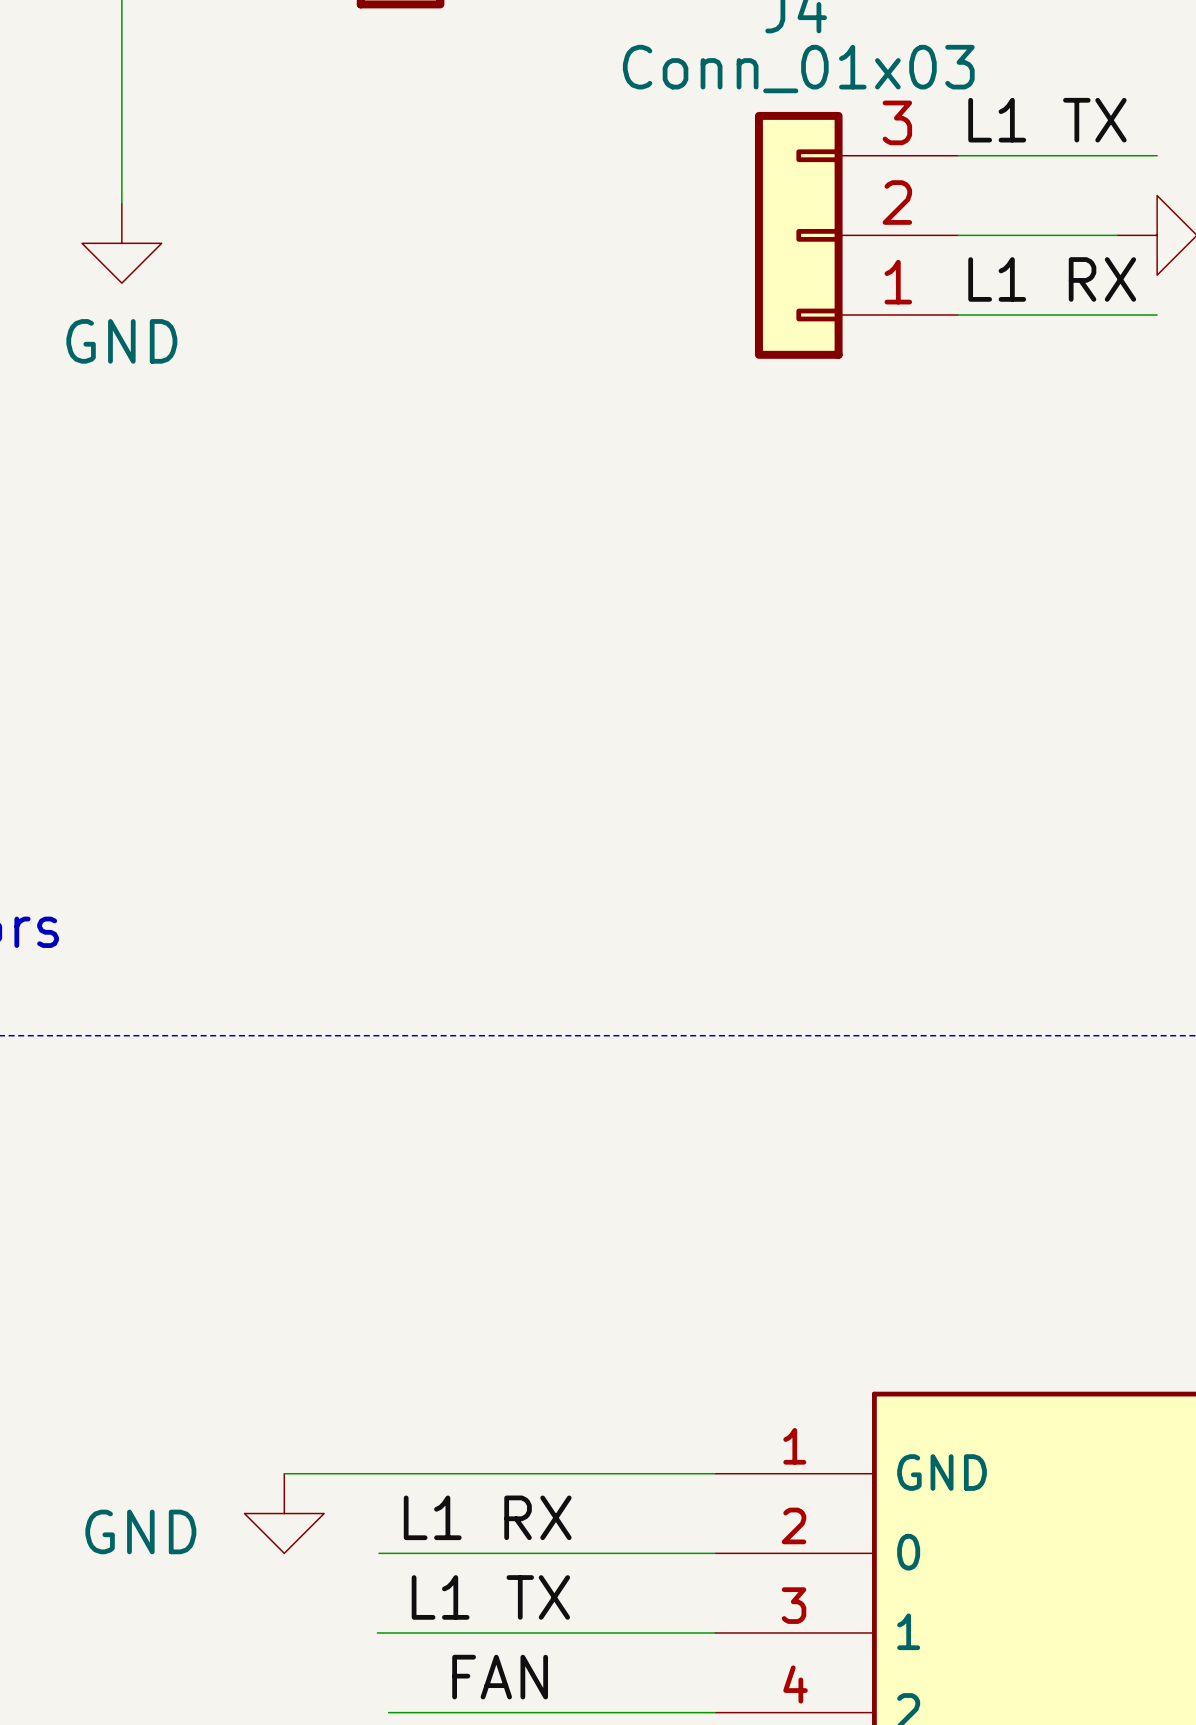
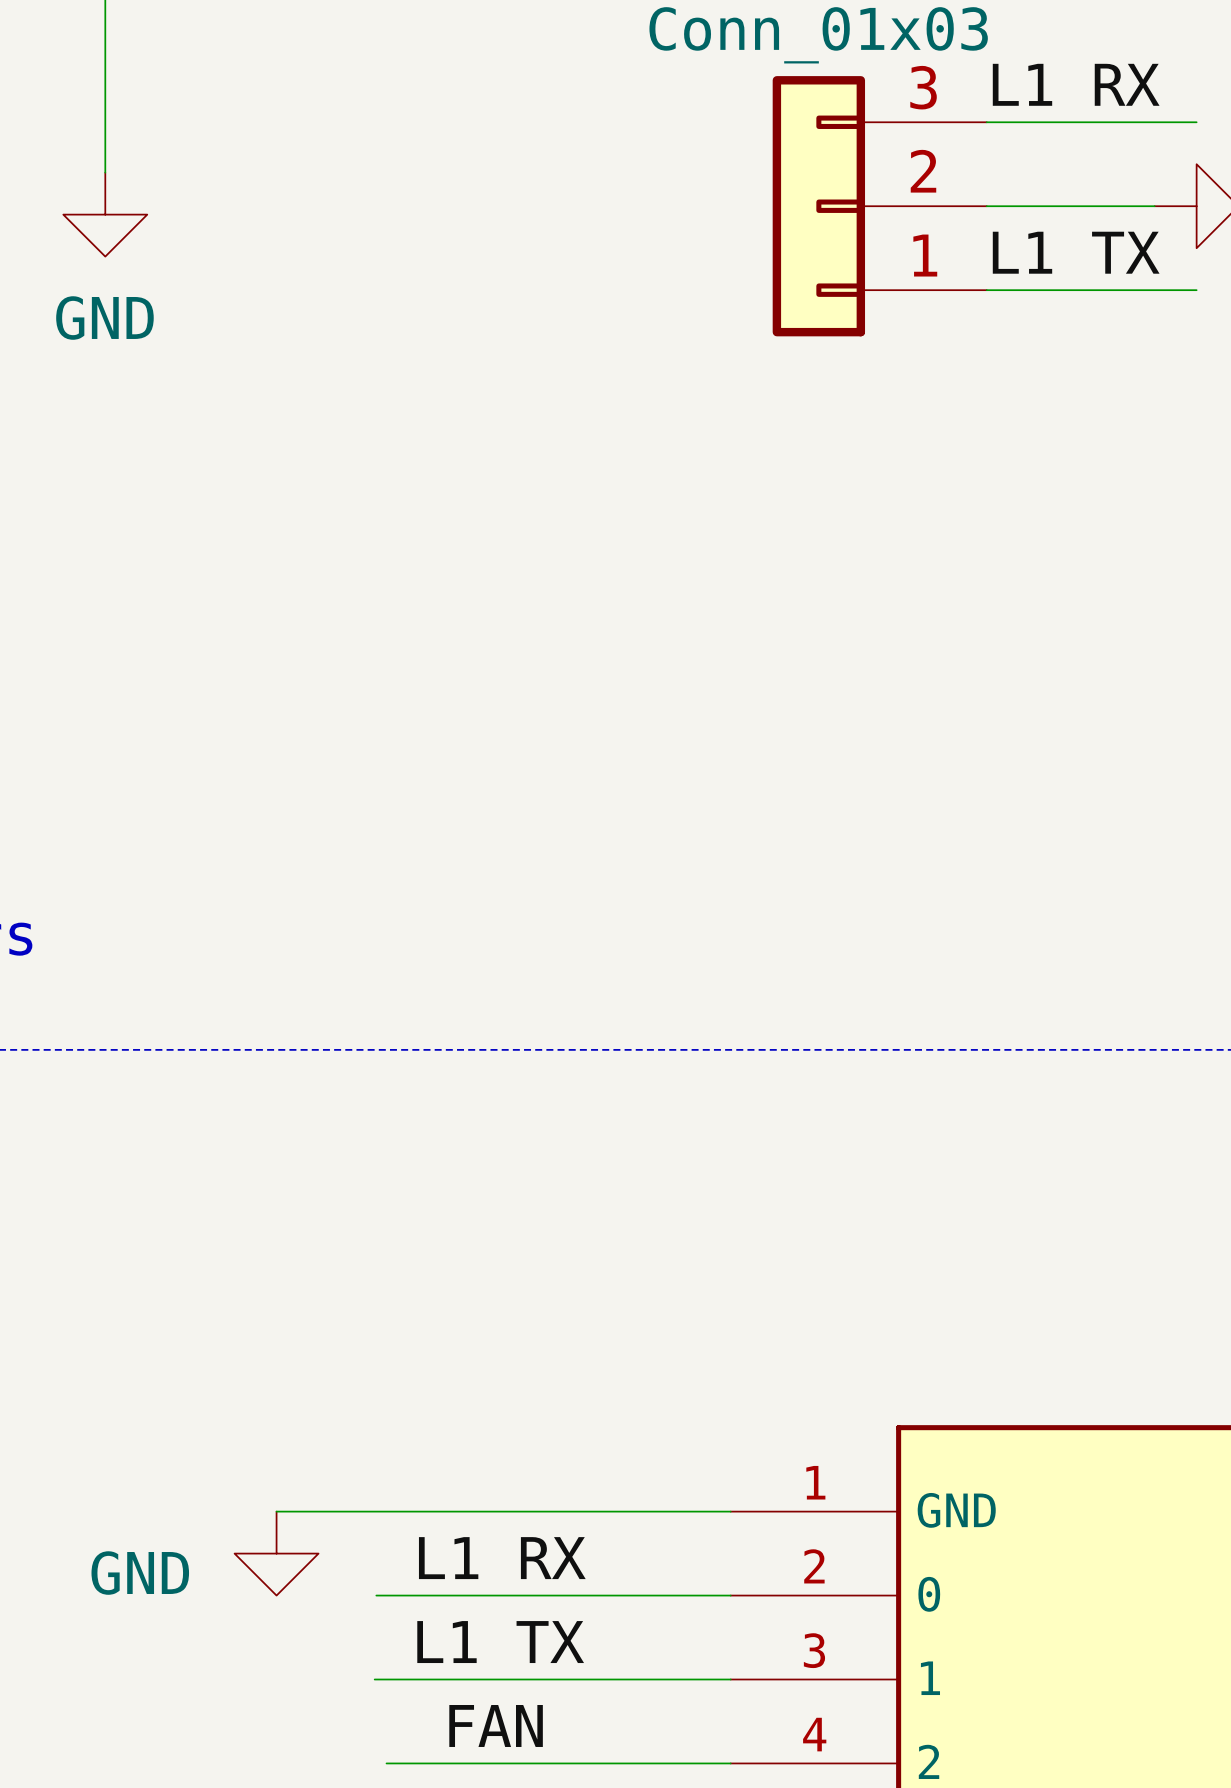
label: L1 TX (1047, 120) -> L1 RX (1076, 84)
label: L1 RX (1052, 279) -> L1 TX (1076, 252)

